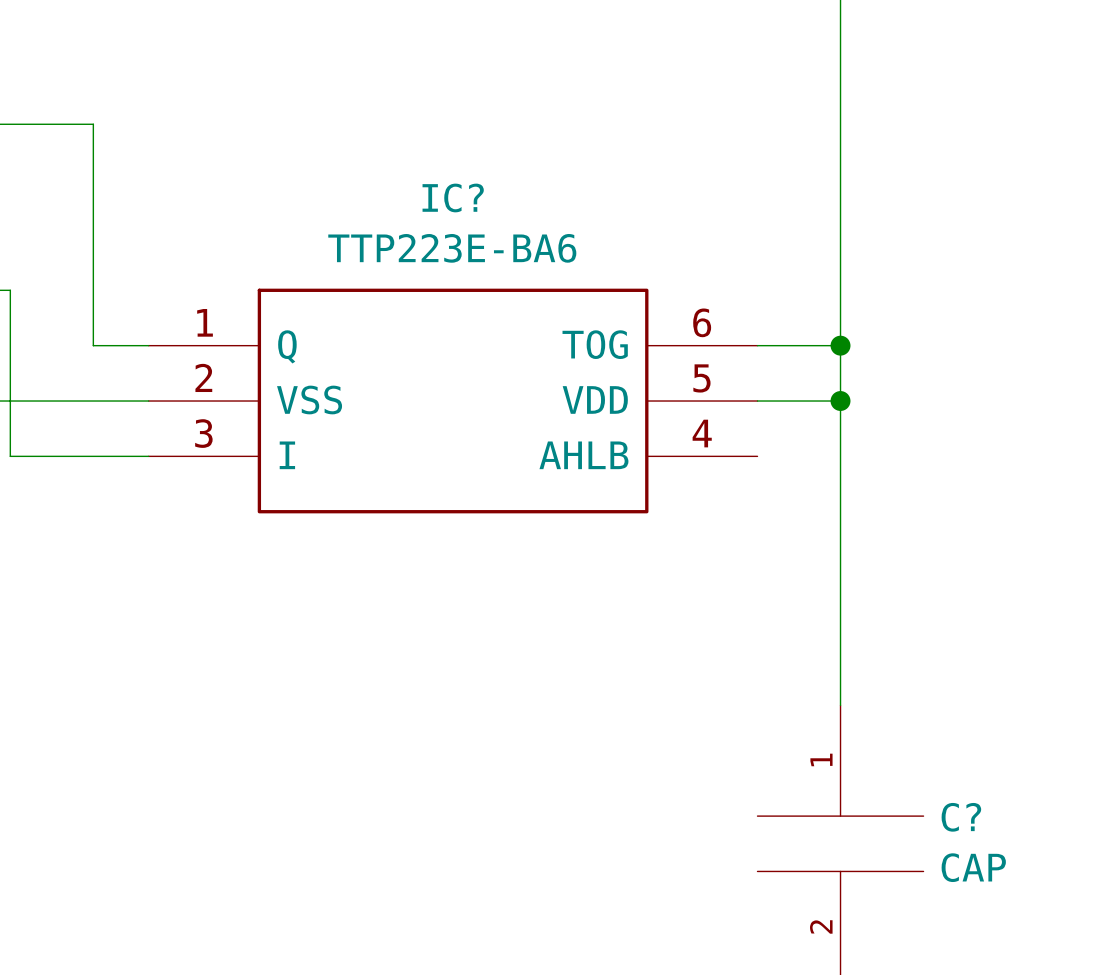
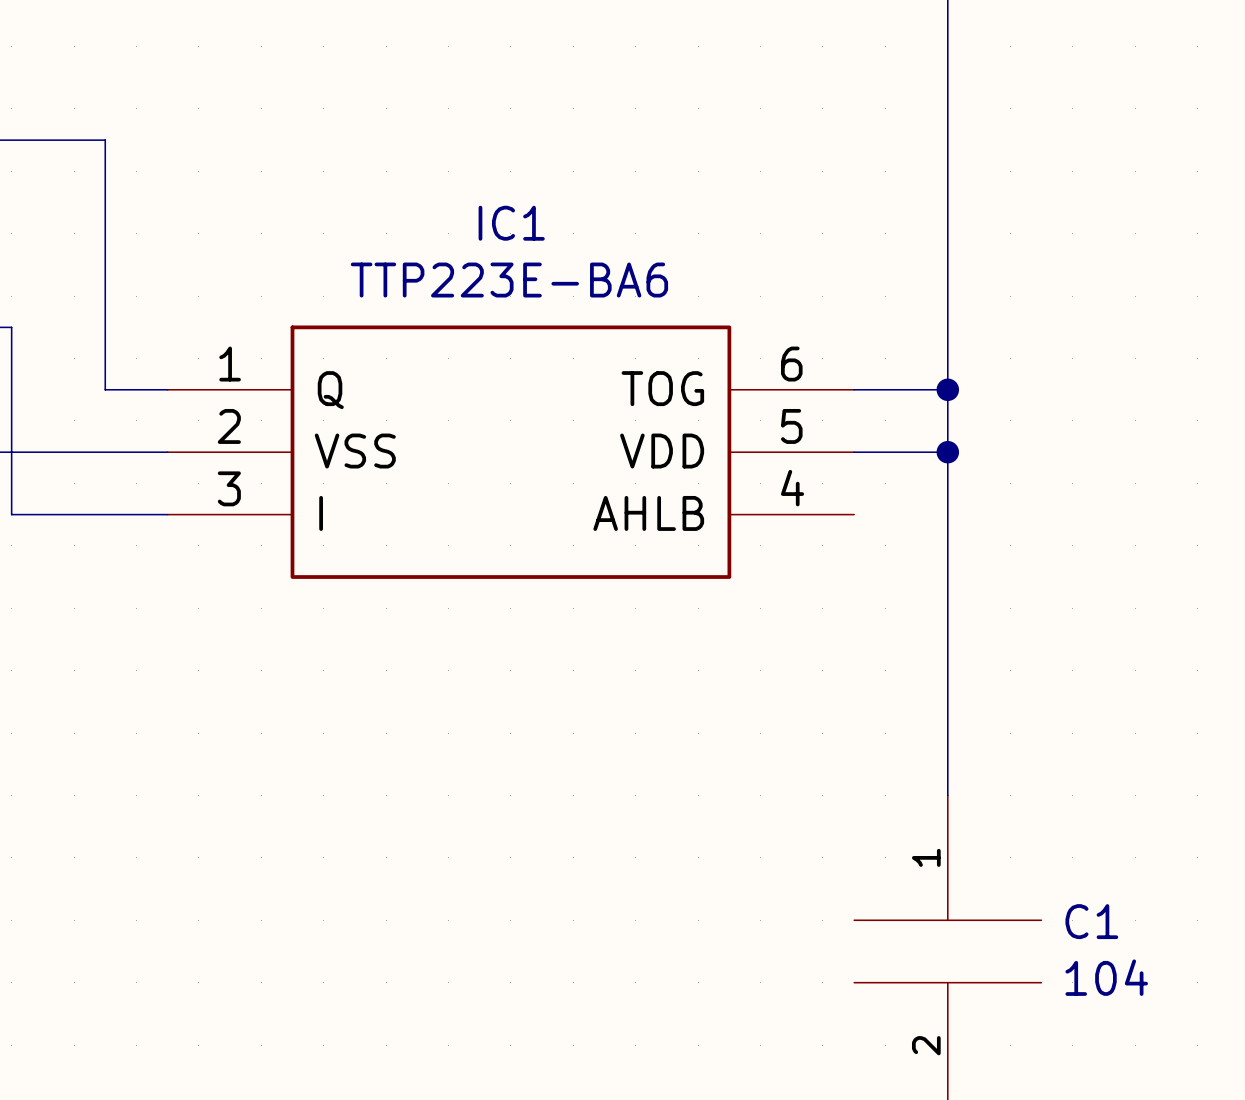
IC? name: IC? (453, 197) -> IC1 (511, 223)
C? name: C? (961, 817) -> C1 (1091, 921)
C? value: CAP (973, 867) -> 104 (1106, 977)

